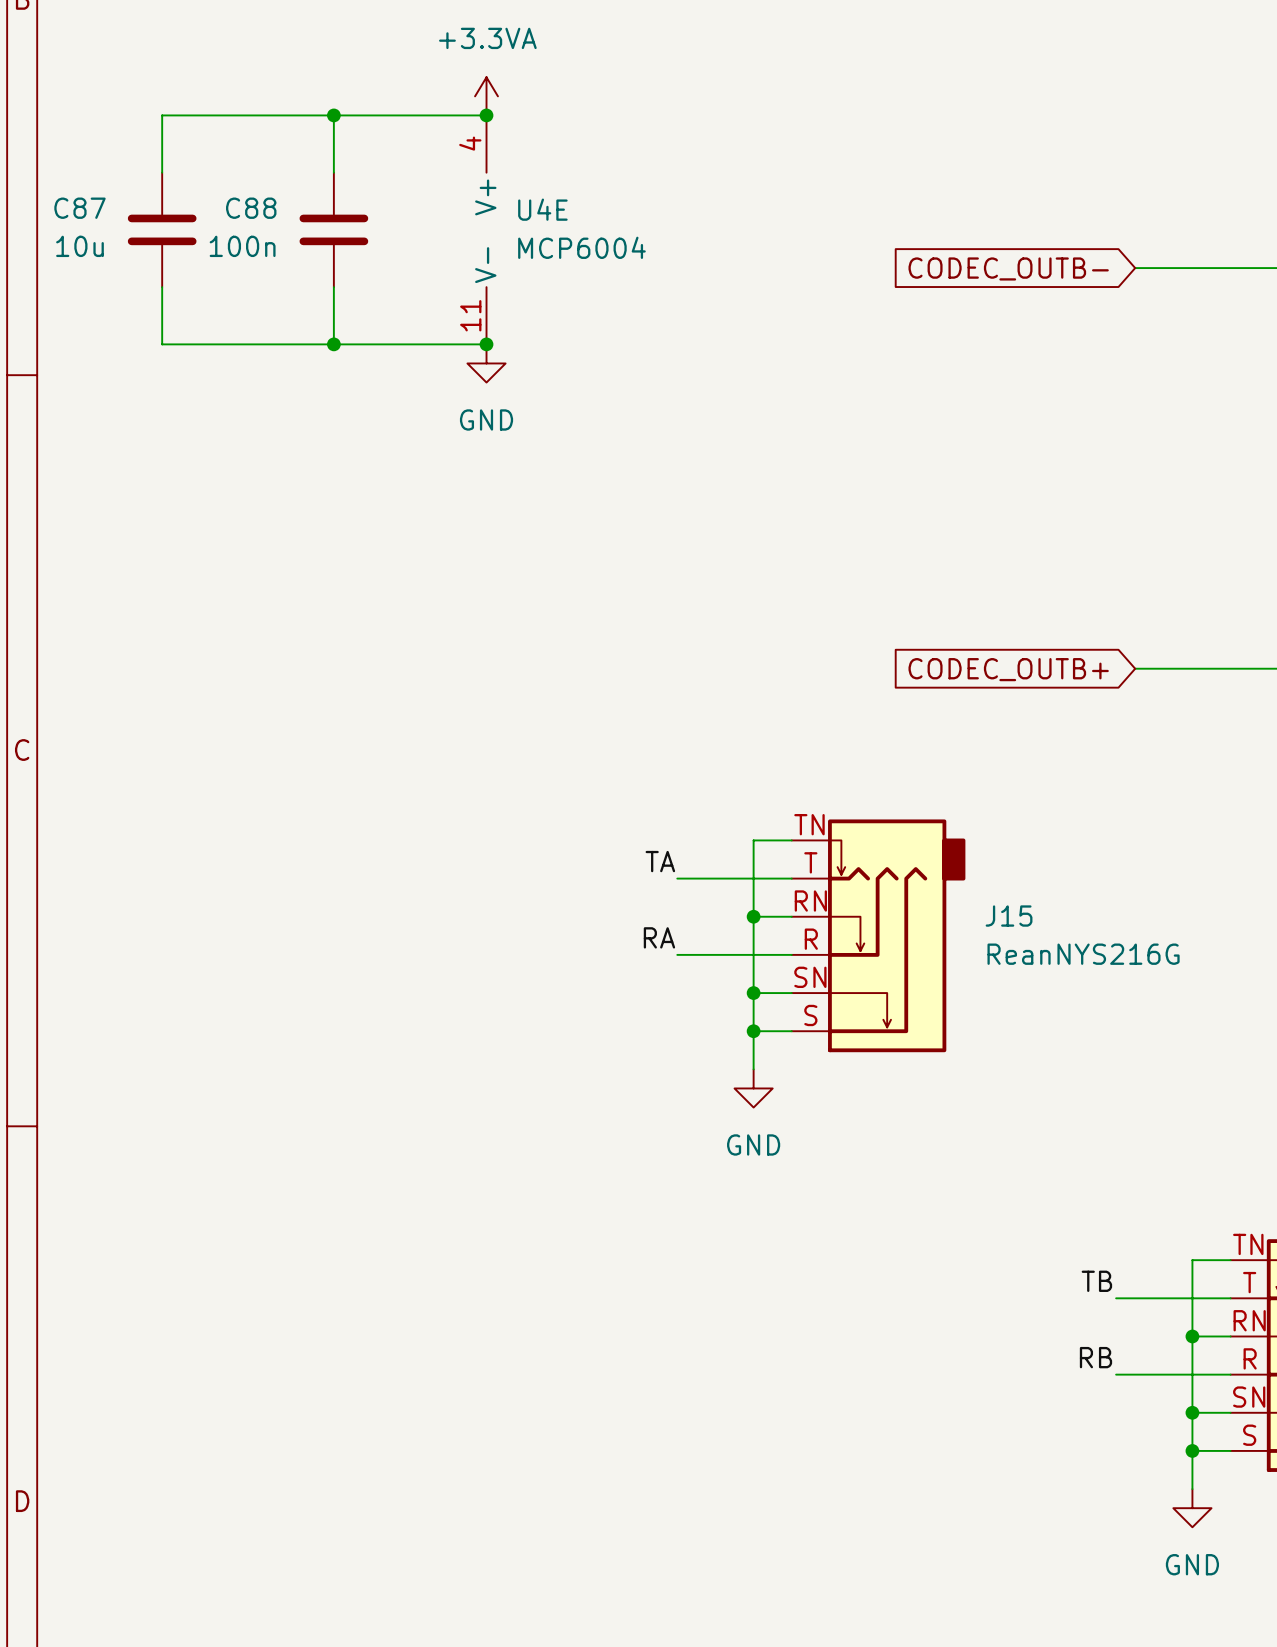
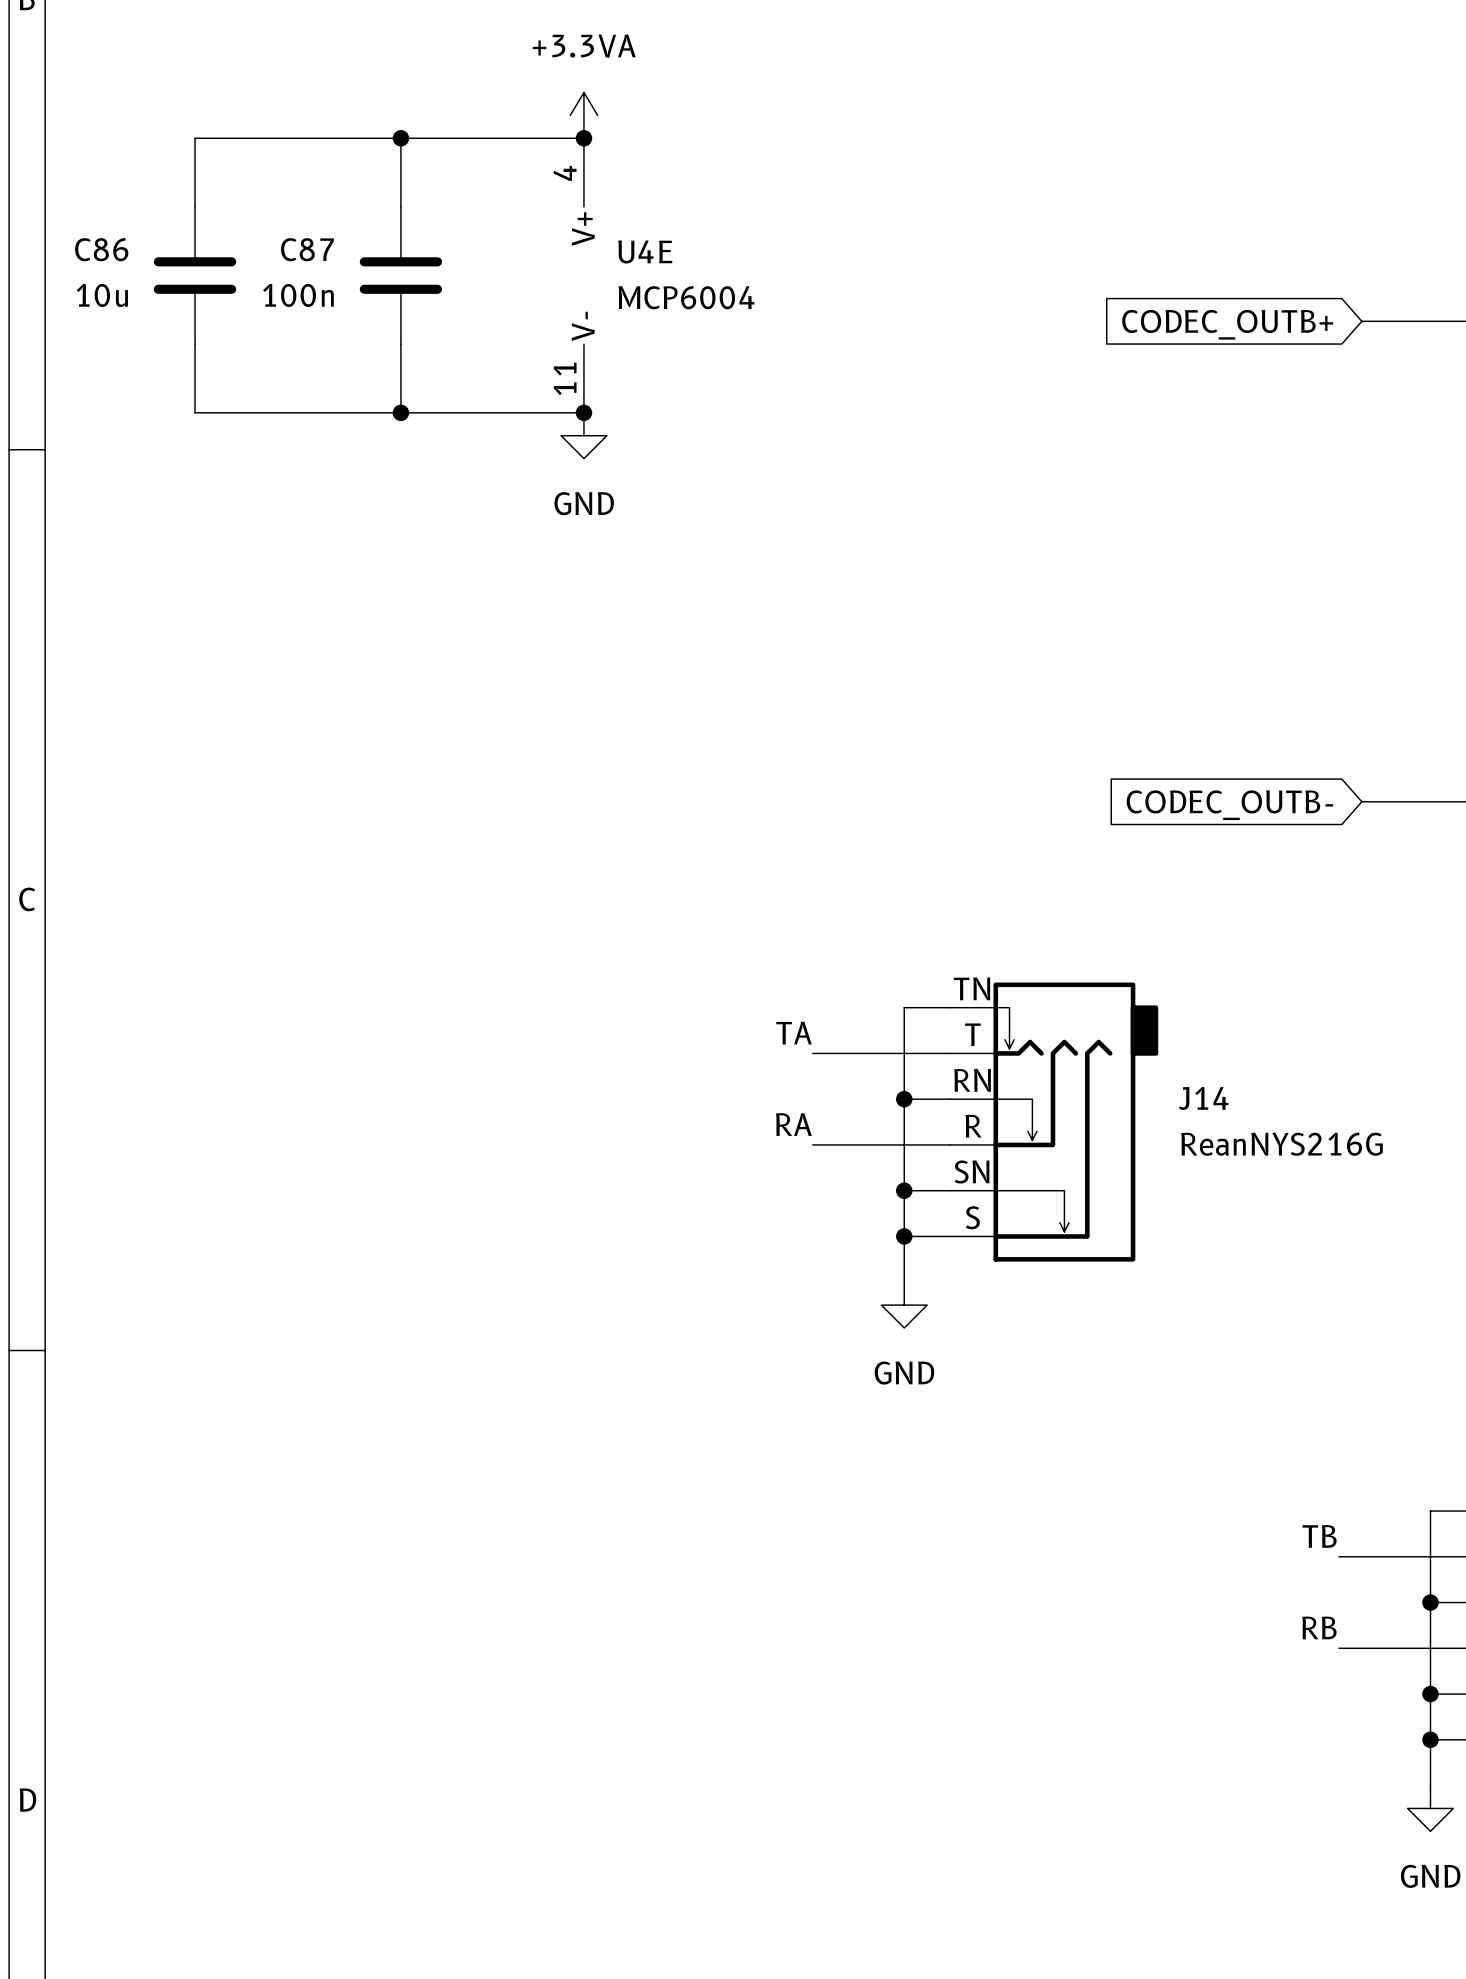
C87 name: C87 (79, 208) -> C86 (101, 249)
C88 name: C88 (251, 208) -> C87 (307, 249)
global label: CODEC_OUTB- (1008, 268) -> CODEC_OUTB+ (1227, 324)
global label: CODEC_OUTB+ (1008, 669) -> CODEC_OUTB- (1229, 805)
J15 name: J15 (1009, 916) -> J14 (1203, 1098)

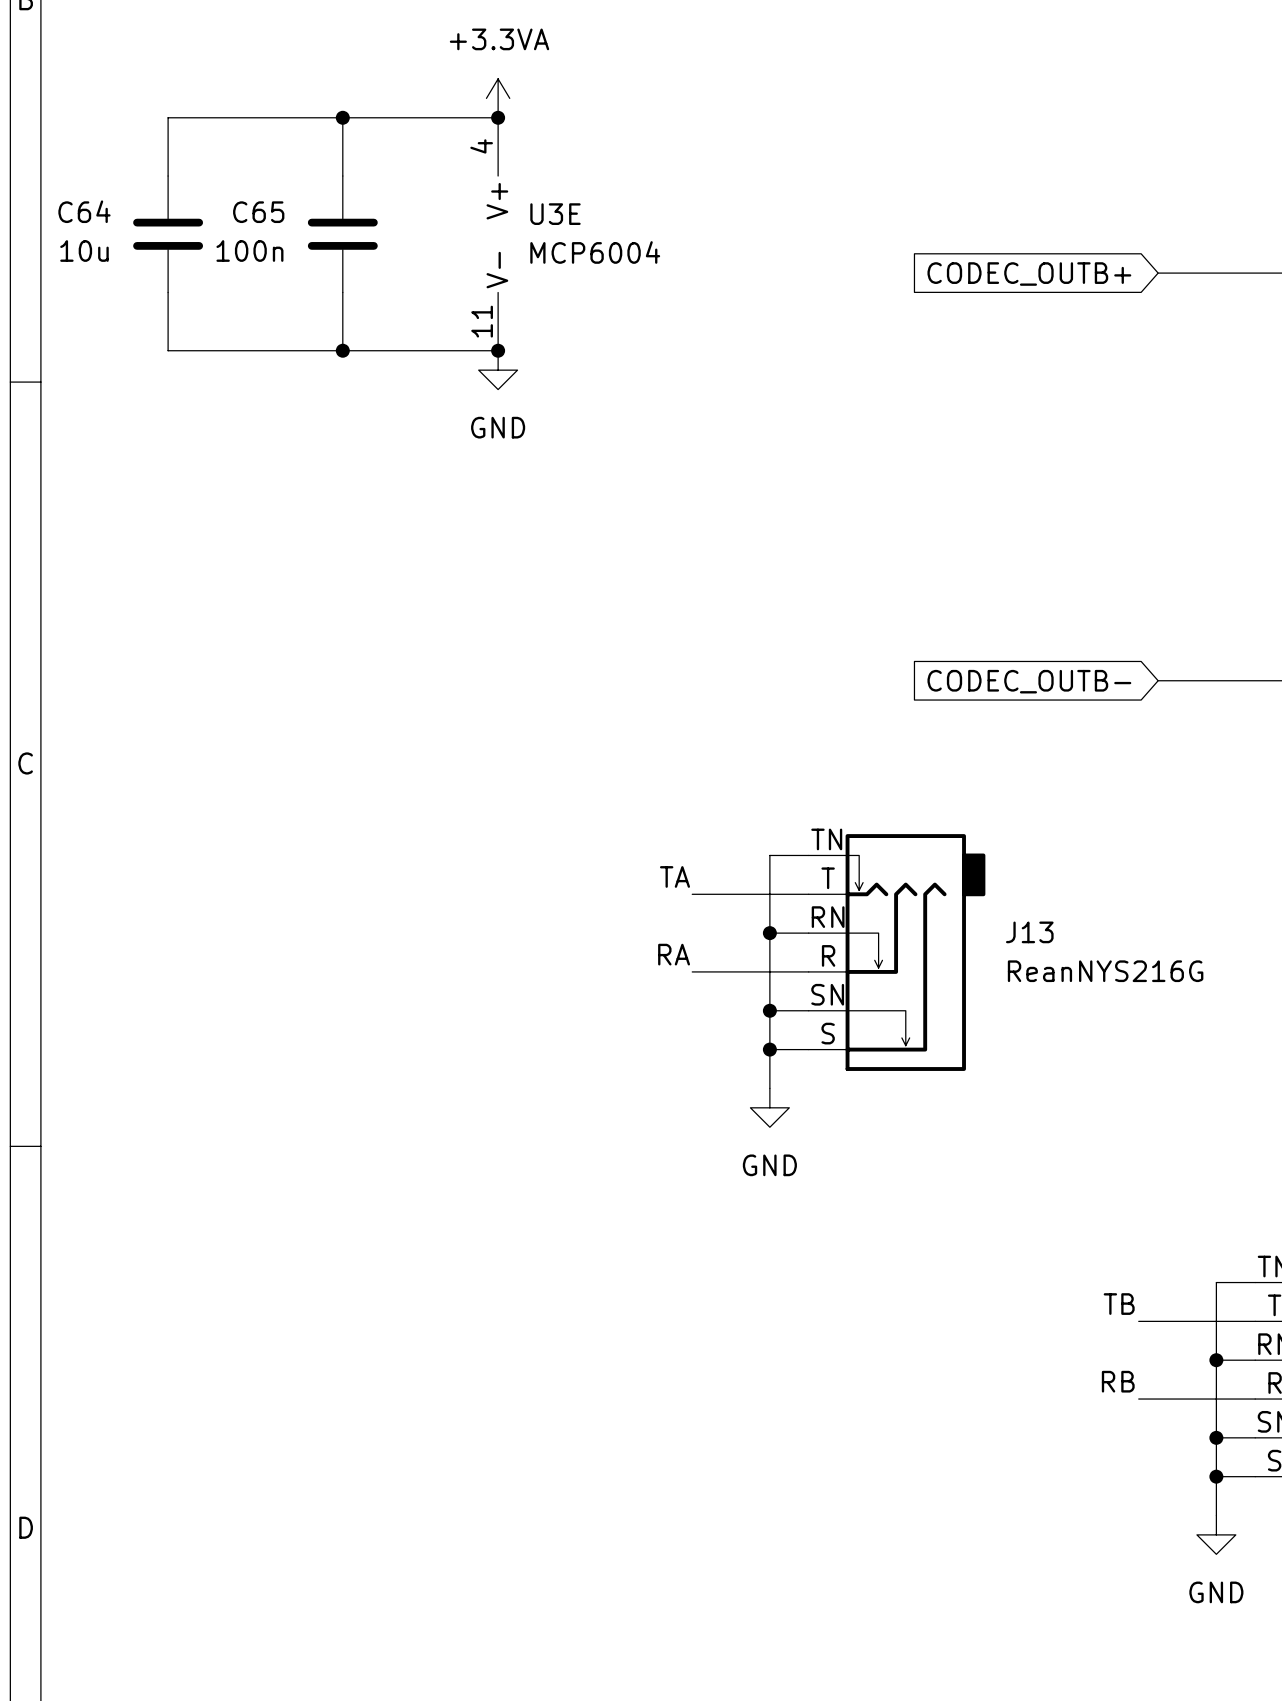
C86 name: C86 (101, 249) -> C64 (84, 211)
C87 name: C87 (307, 249) -> C65 (258, 212)
U4E name: U4E (645, 251) -> U3E (555, 214)
J14 name: J14 (1203, 1098) -> J13 (1029, 932)

